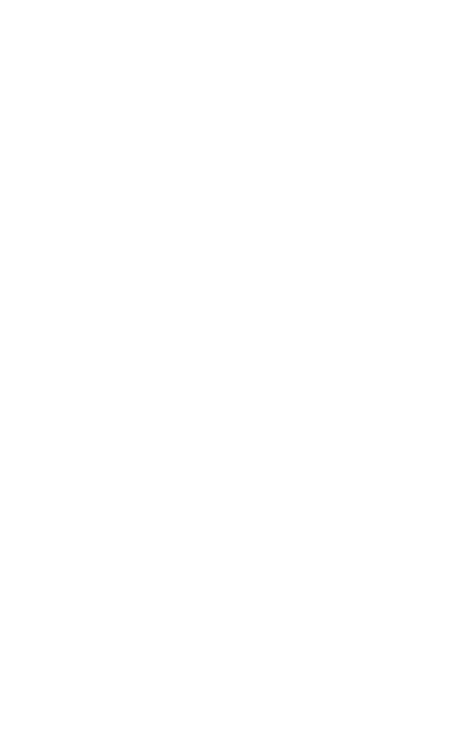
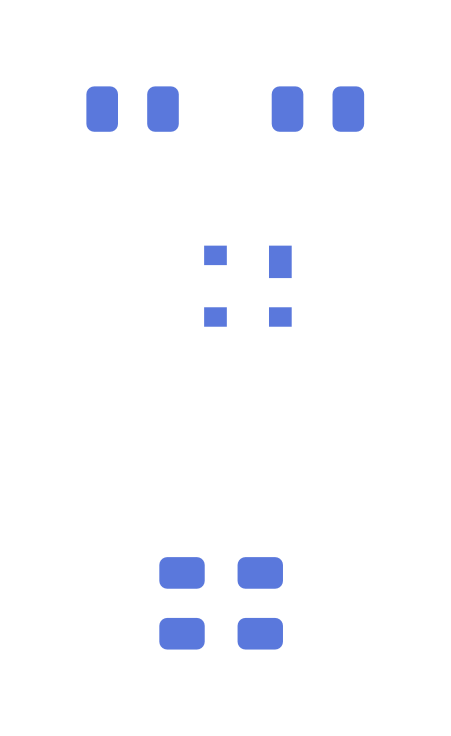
part: none -> (132, 109)
part: none -> (317, 109)
part: none -> (247, 286)
part: none -> (182, 603)
part: none -> (260, 603)

